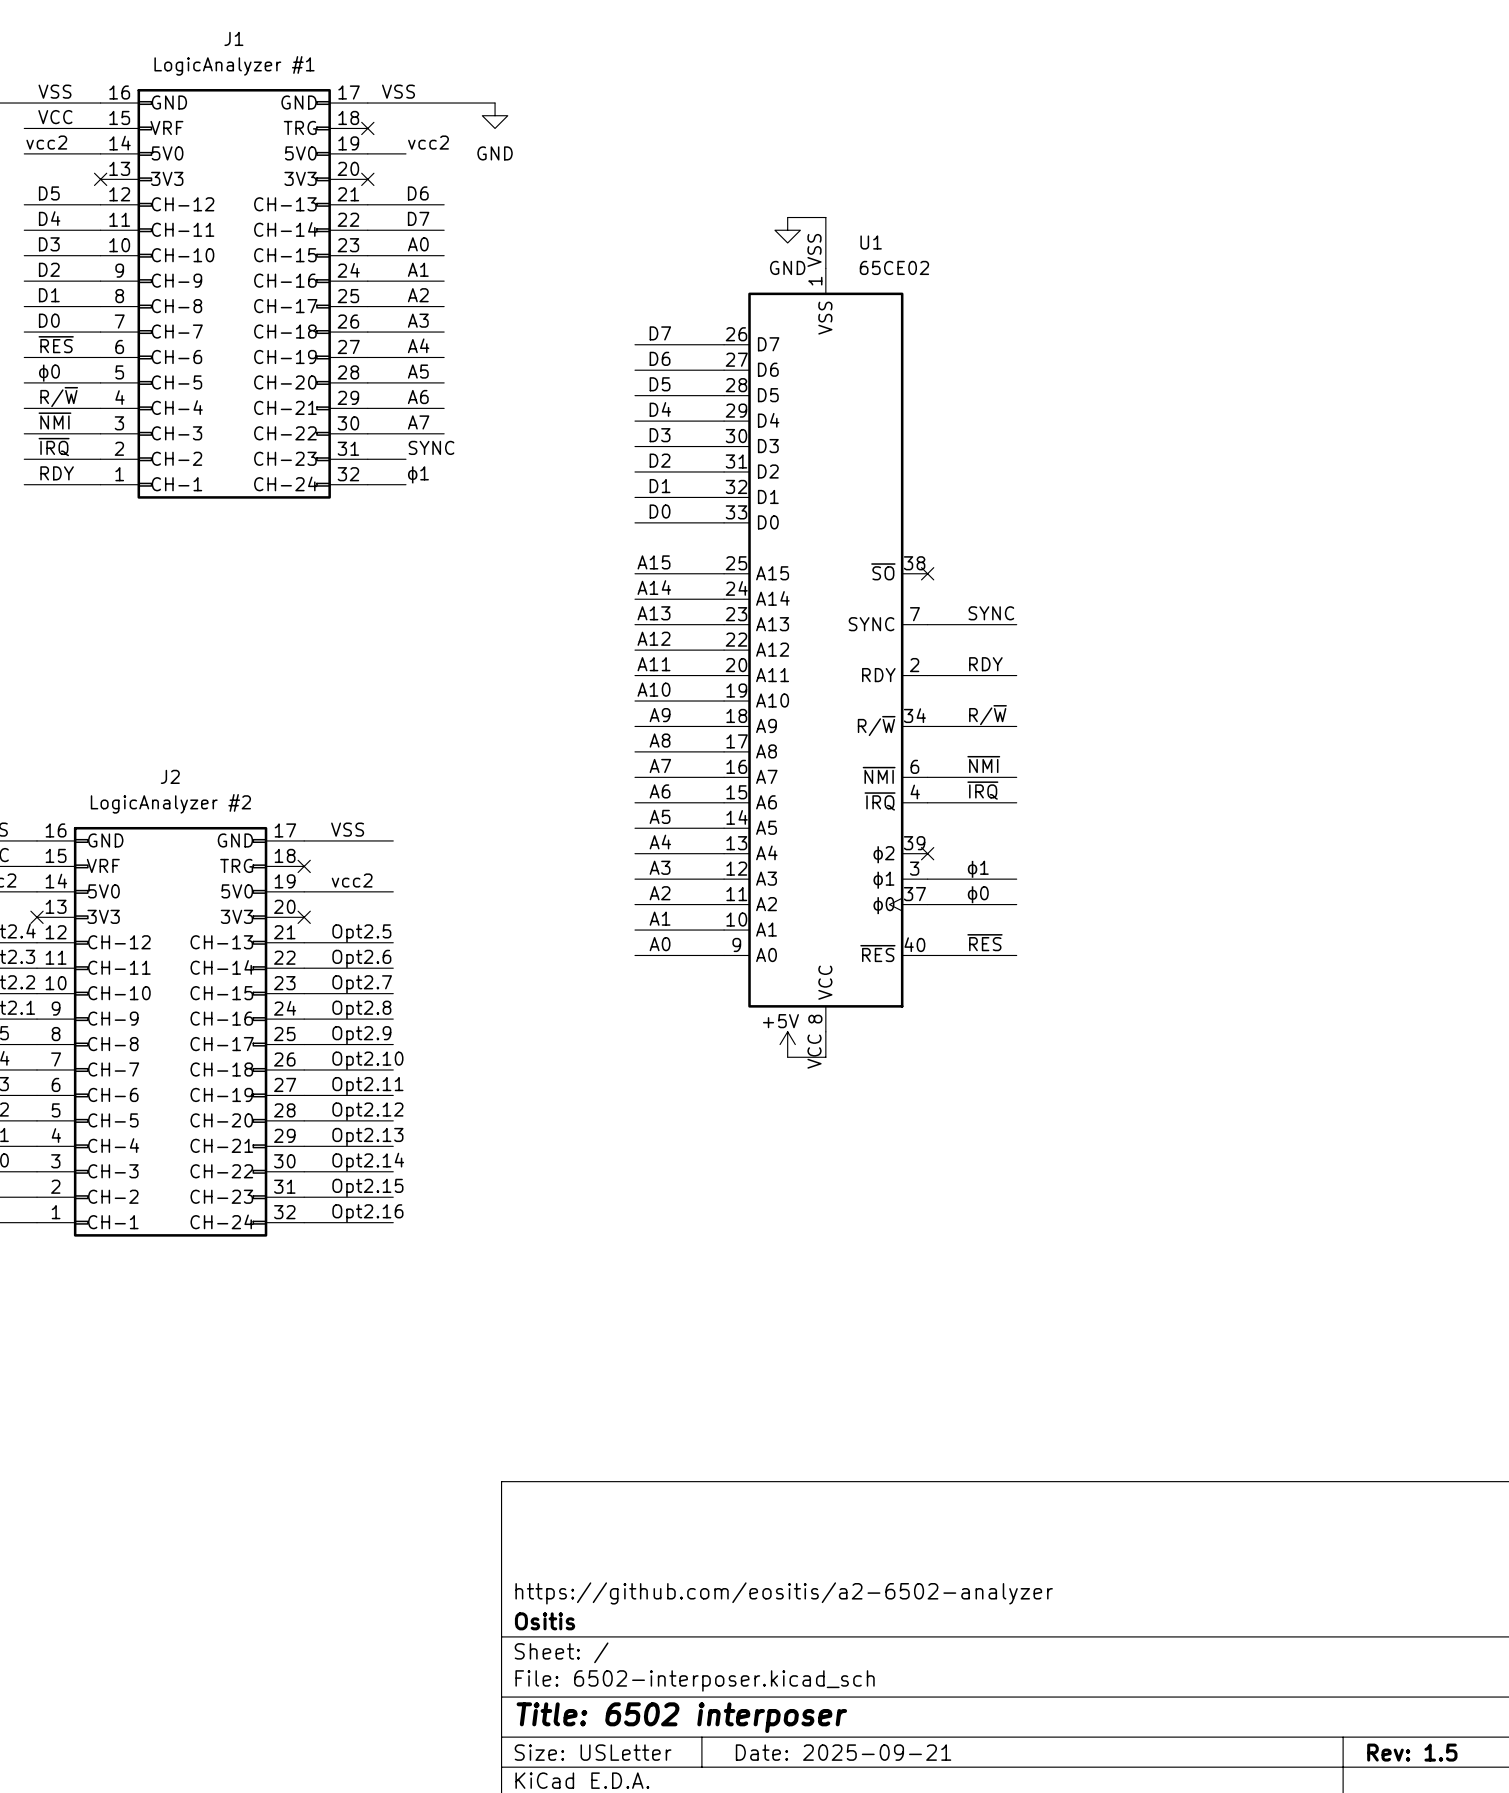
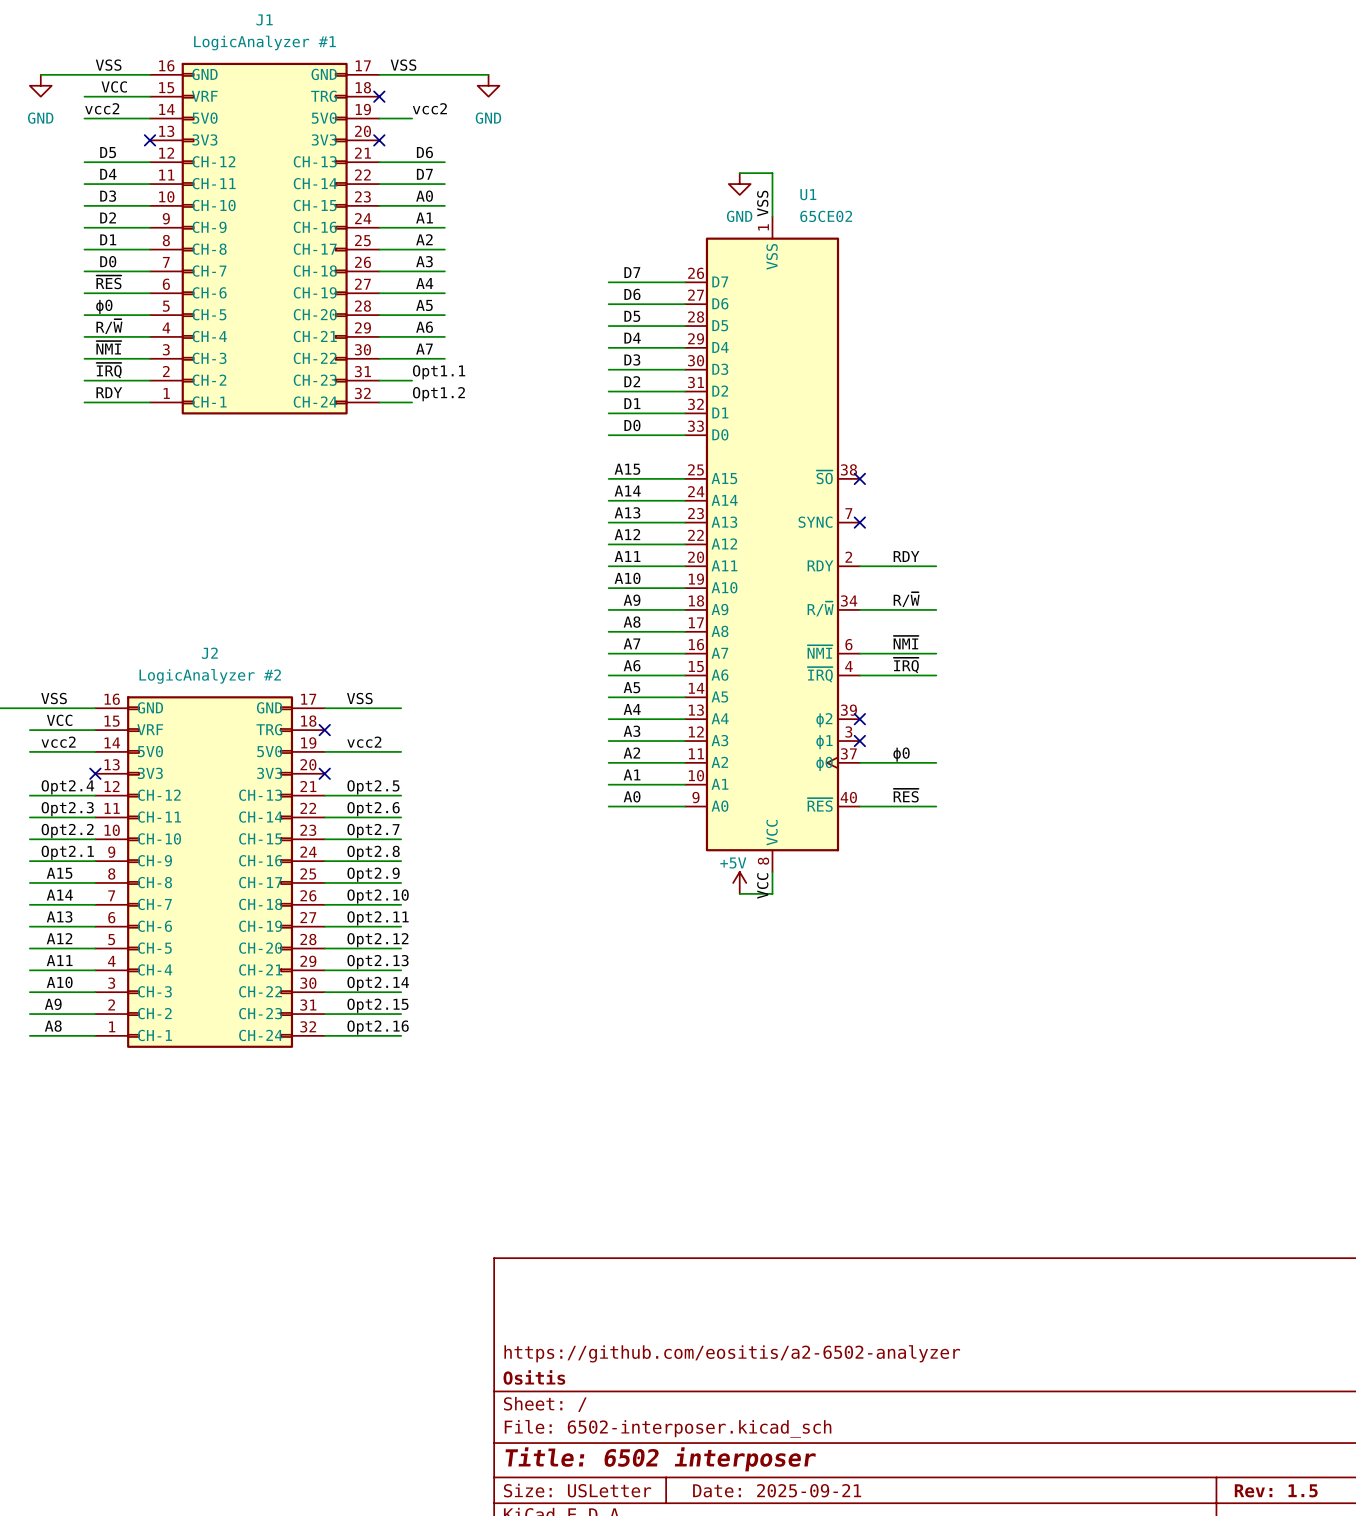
label: SYNC (431, 447) -> Opt1.1 (439, 372)
label: ϕ1 (418, 474) -> Opt1.2 (438, 394)
label: SYNC (991, 613) -> none
wire: (927, 624) (1016, 624) -> none
no-connect mark: none -> (859, 522)
label: ϕ1 (977, 869) -> none
wire: (927, 879) (1016, 879) -> none
no-connect mark: none -> (859, 741)

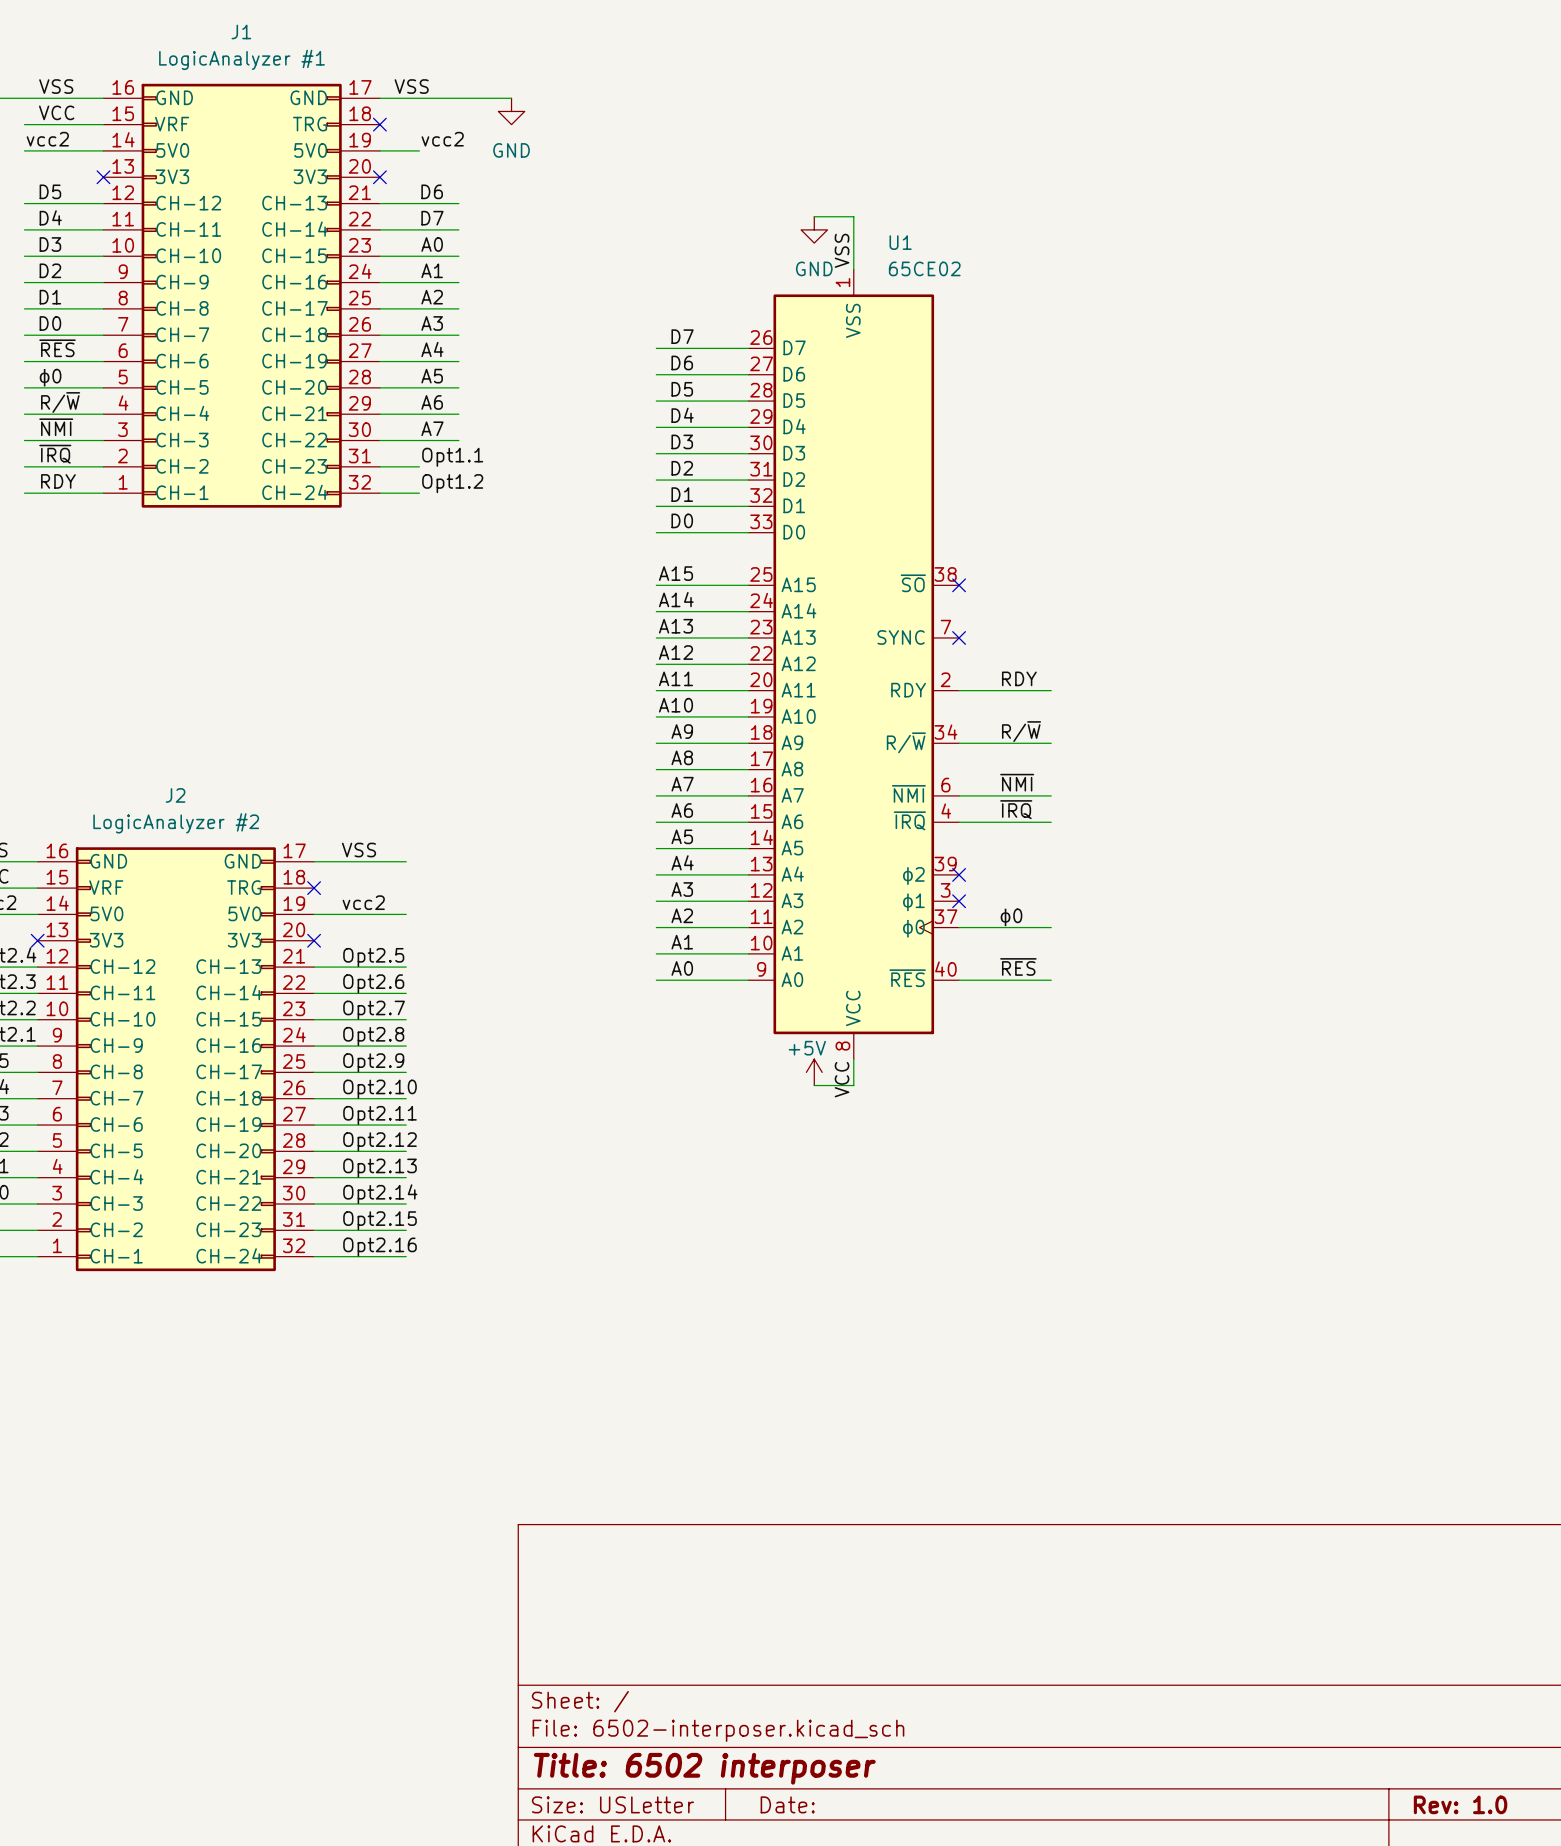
title block: https://github.com/eositis/a2-6502-analyzer (732, 1353) -> none
title block: Ositis (534, 1377) -> none
title block: Date: 2025-09-21 (777, 1490) -> Date: (787, 1804)
title block: Rev: 1.5 (1276, 1490) -> Rev: 1.0 (1460, 1804)

